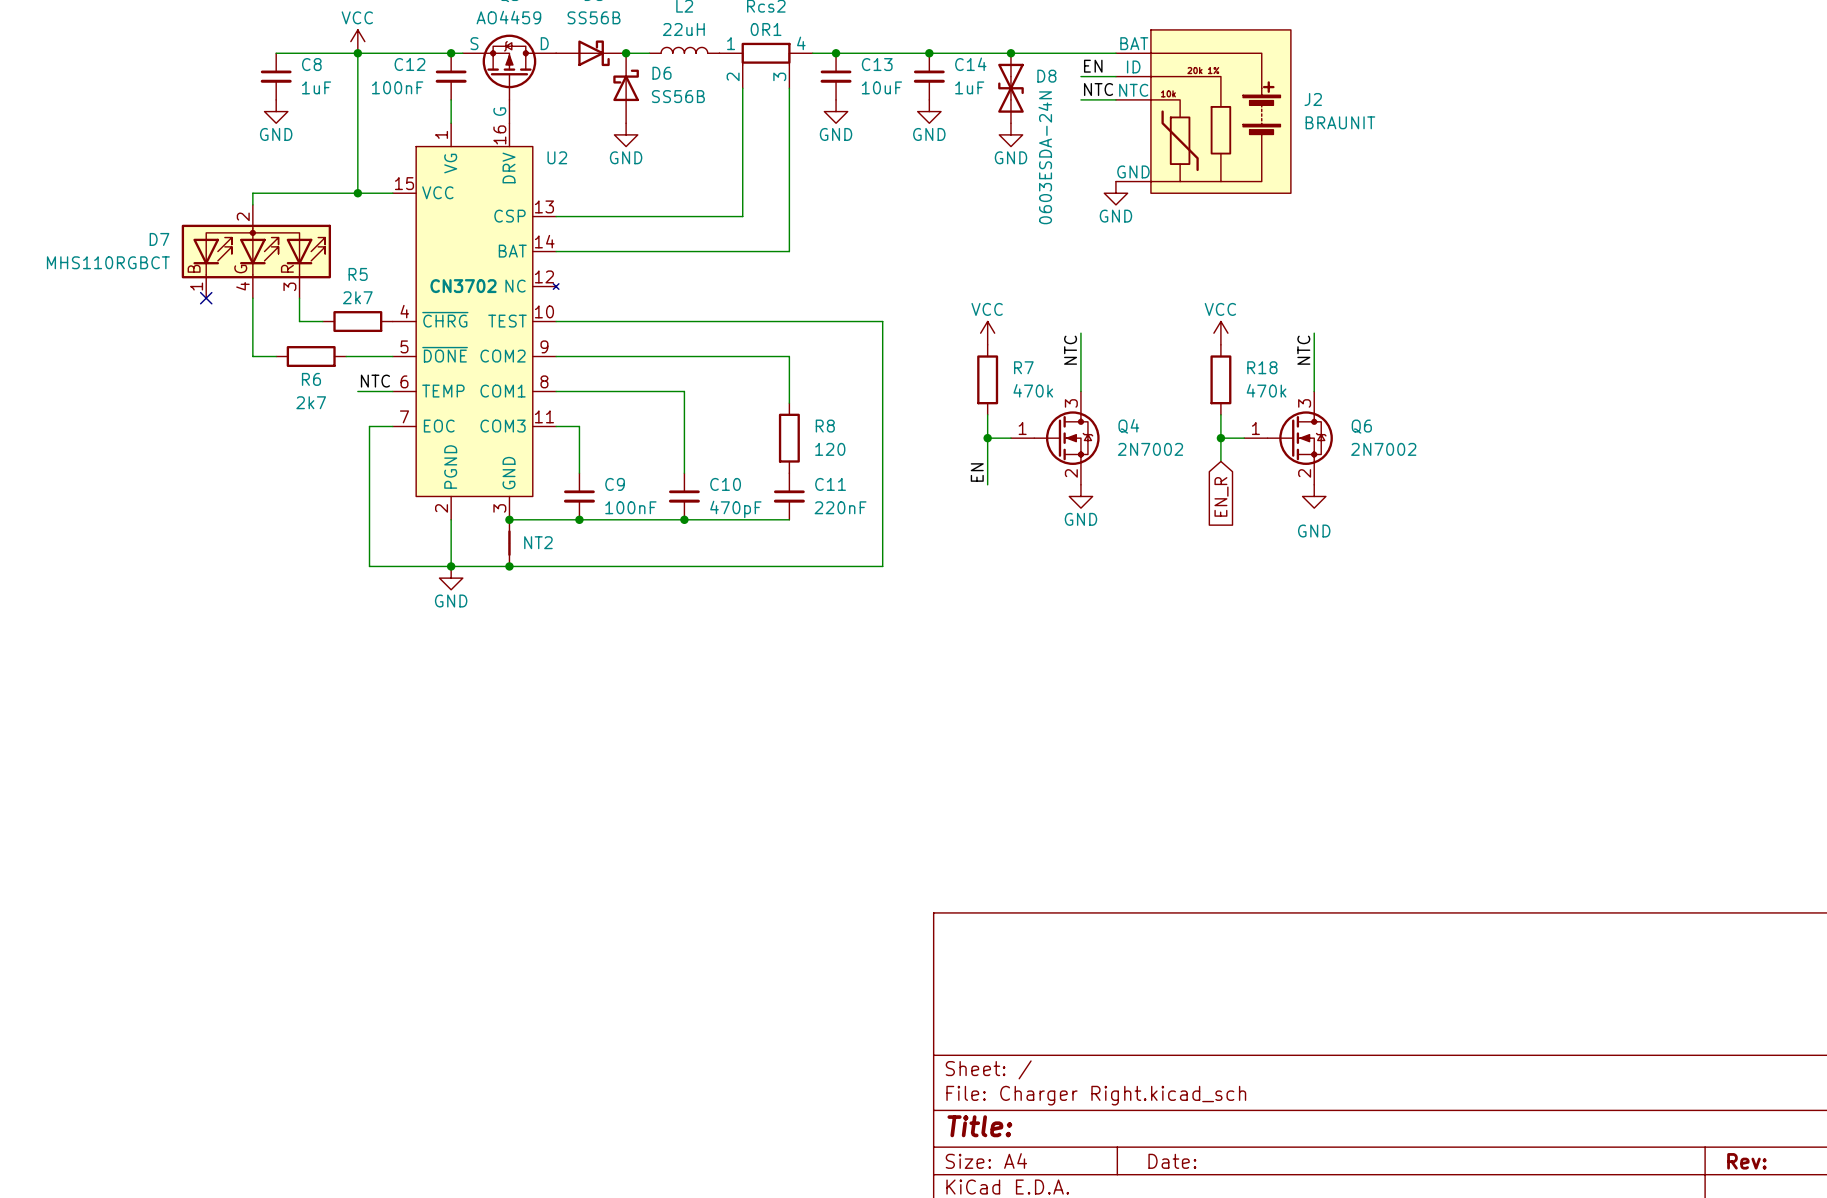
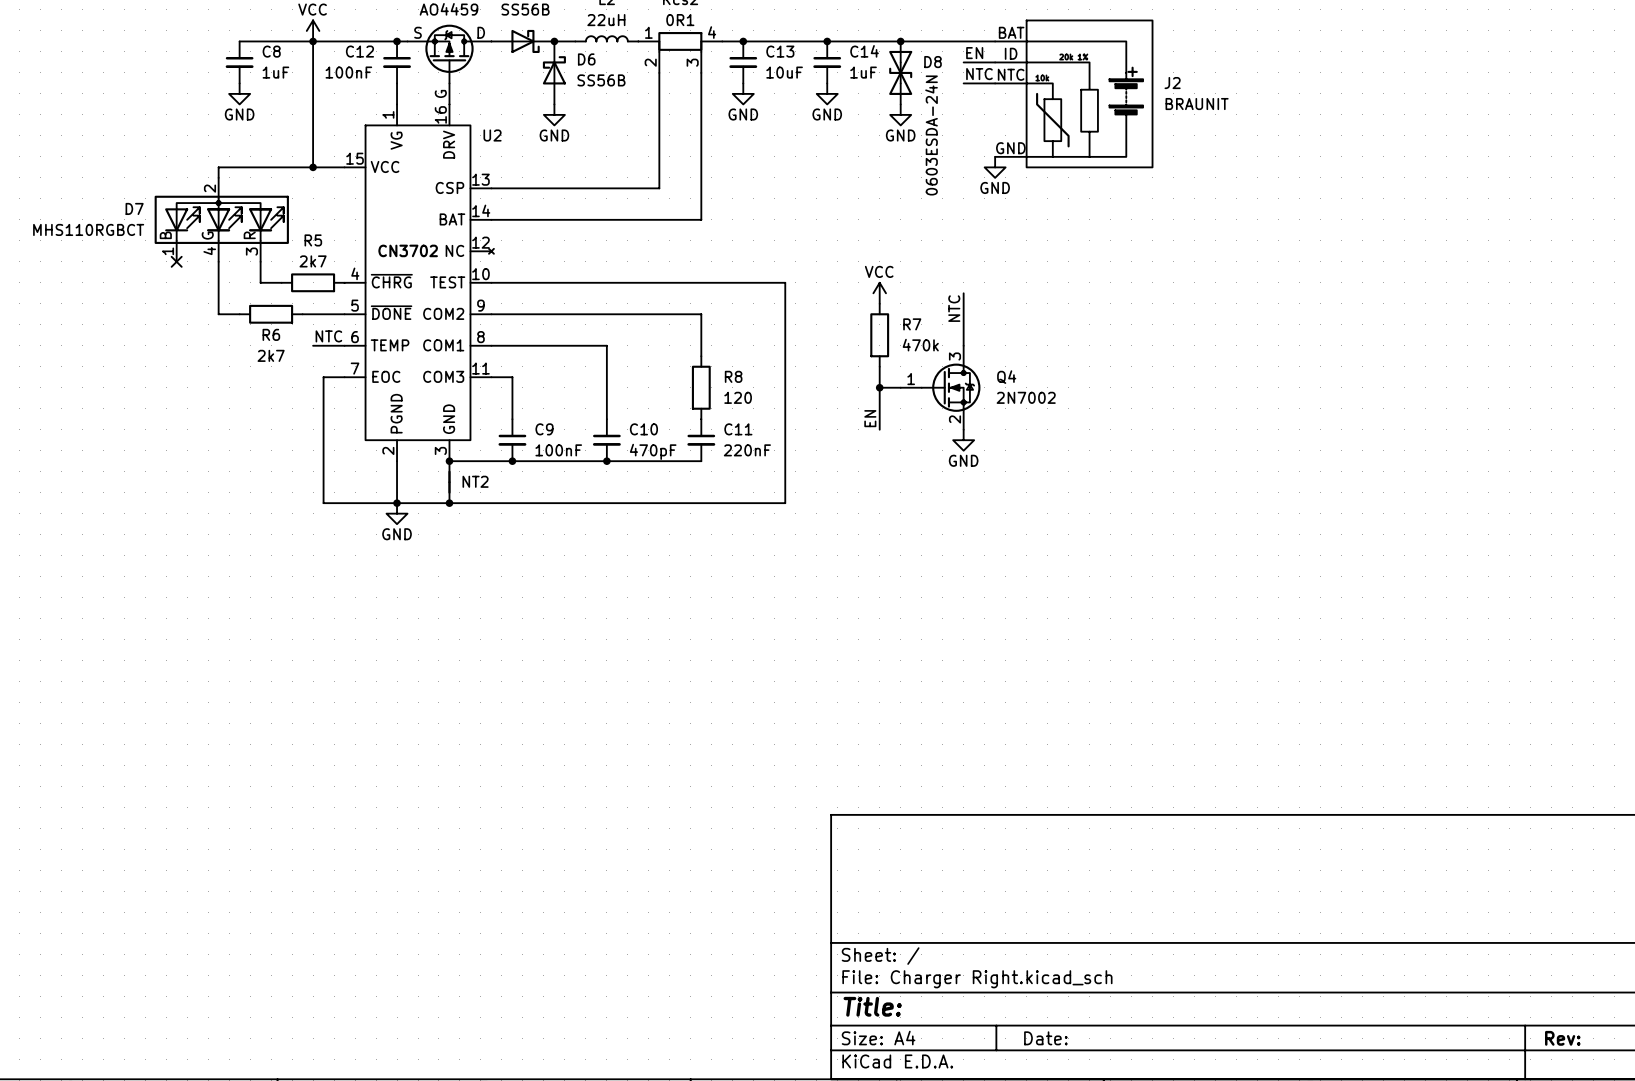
power symbol: VCC (1220, 333) -> none
wire: (1314, 333) (1314, 391) -> none
label: NTC (1303, 350) -> none
R18: 470k (1220, 379) -> none
wire: (1220, 414) (1220, 461) -> none
wire: (1220, 438) (1244, 438) -> none
junction: (1220, 438) -> none
Q6: 2N7002 (1288, 438) -> none
global label: EN_R (1221, 496) -> none
power symbol: GND (1314, 496) -> none

